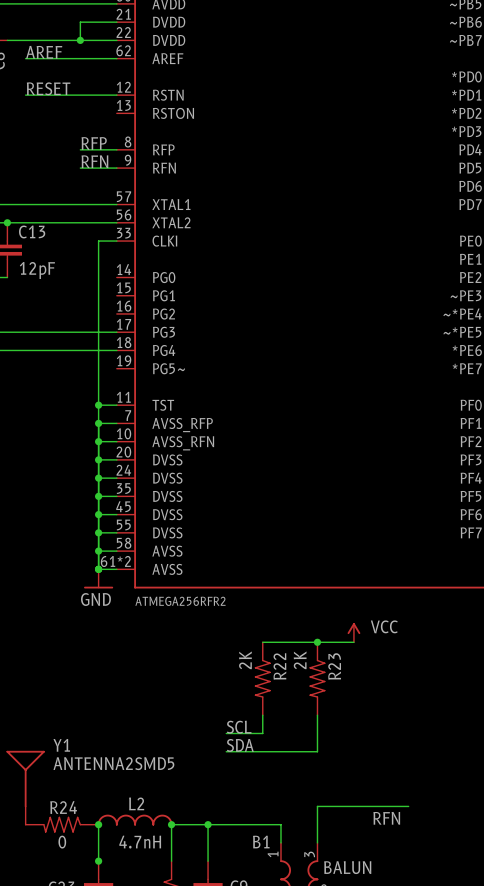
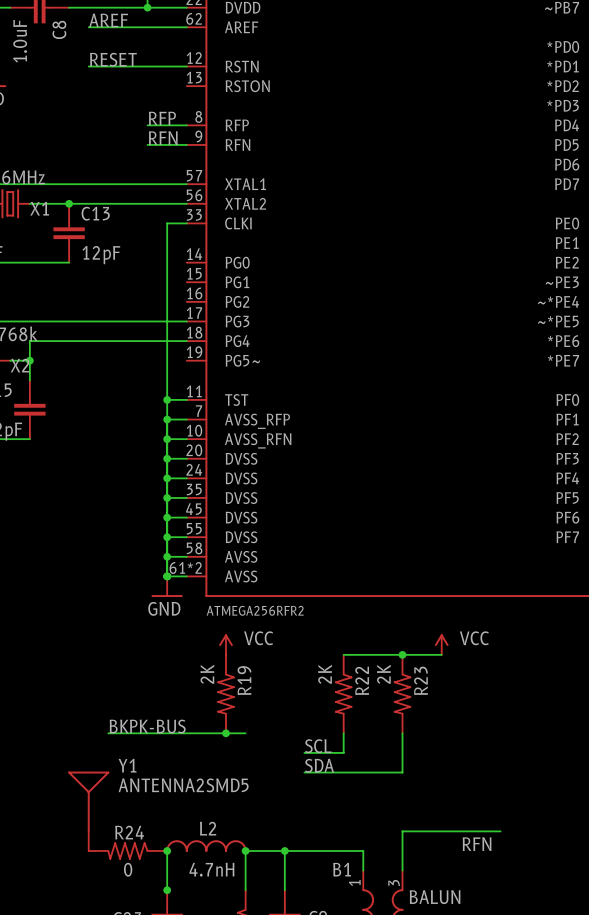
power symbol: none -> VCC (226, 644)
R19: none -> 2K (226, 694)
label: none -> BKPK-BUS (147, 726)
wire: none -> (108, 733) (245, 733)
junction: none -> (226, 733)

